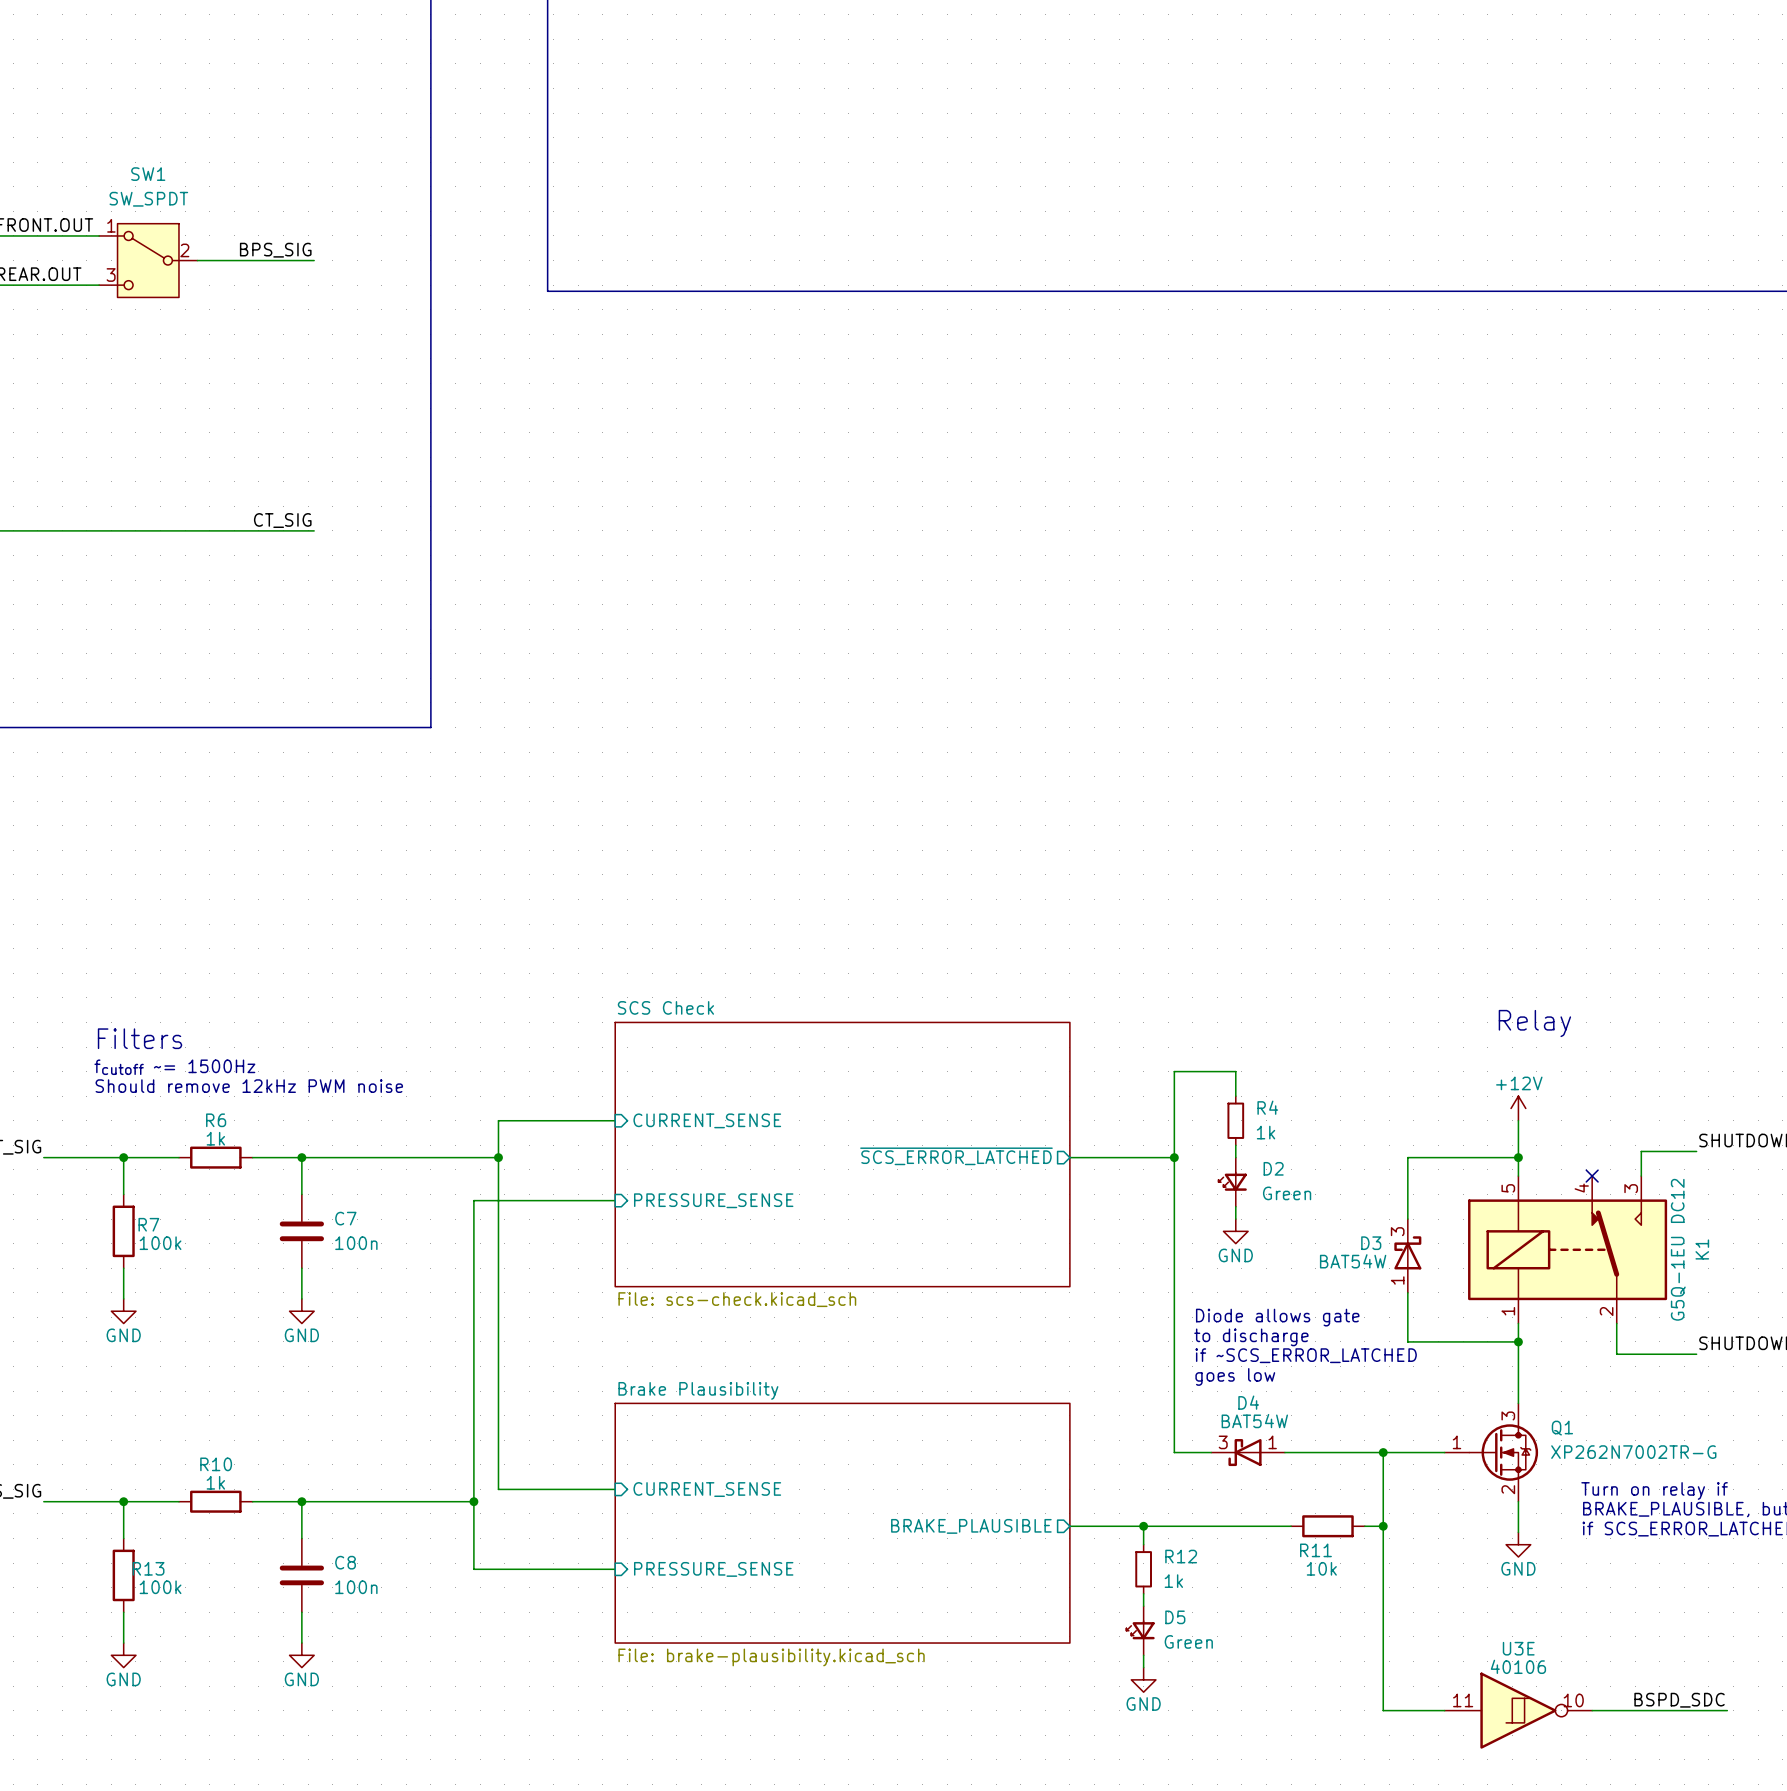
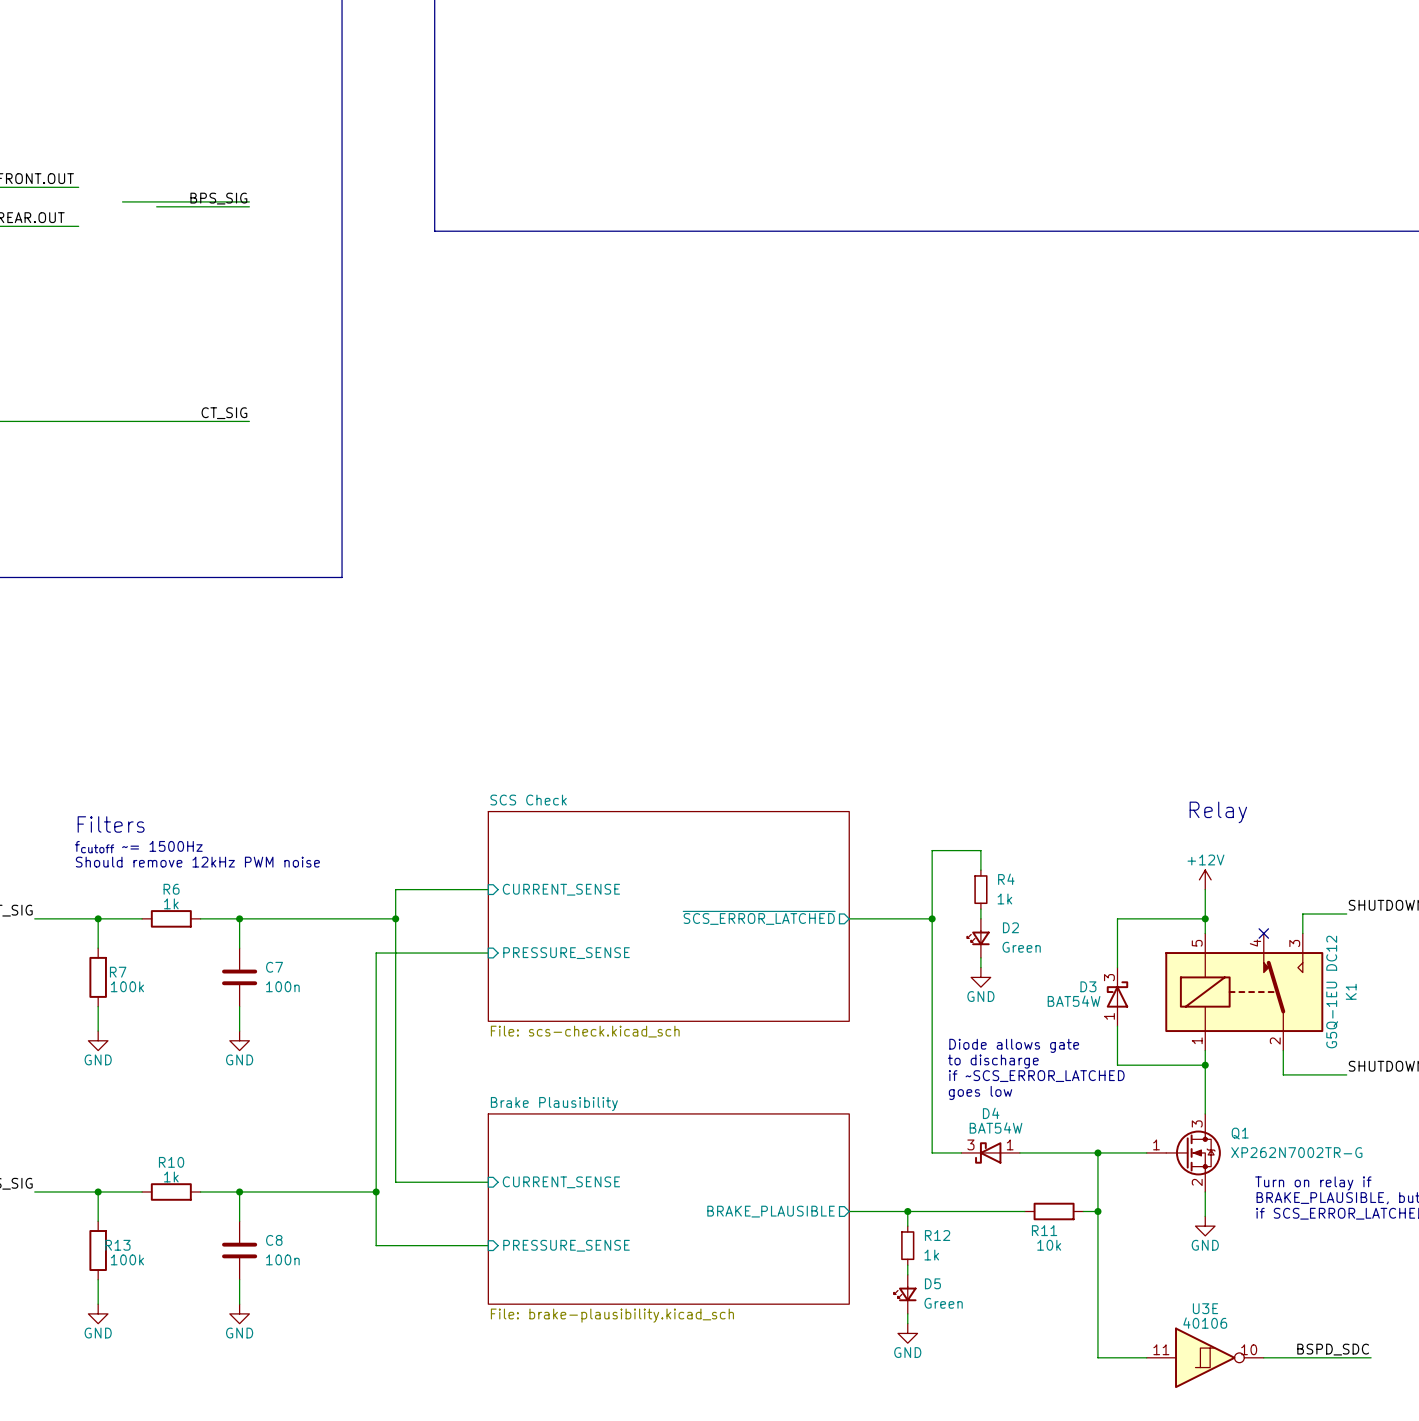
wire: none -> (122, 201) (249, 201)
SW1: SW_SPDT (148, 260) -> none

